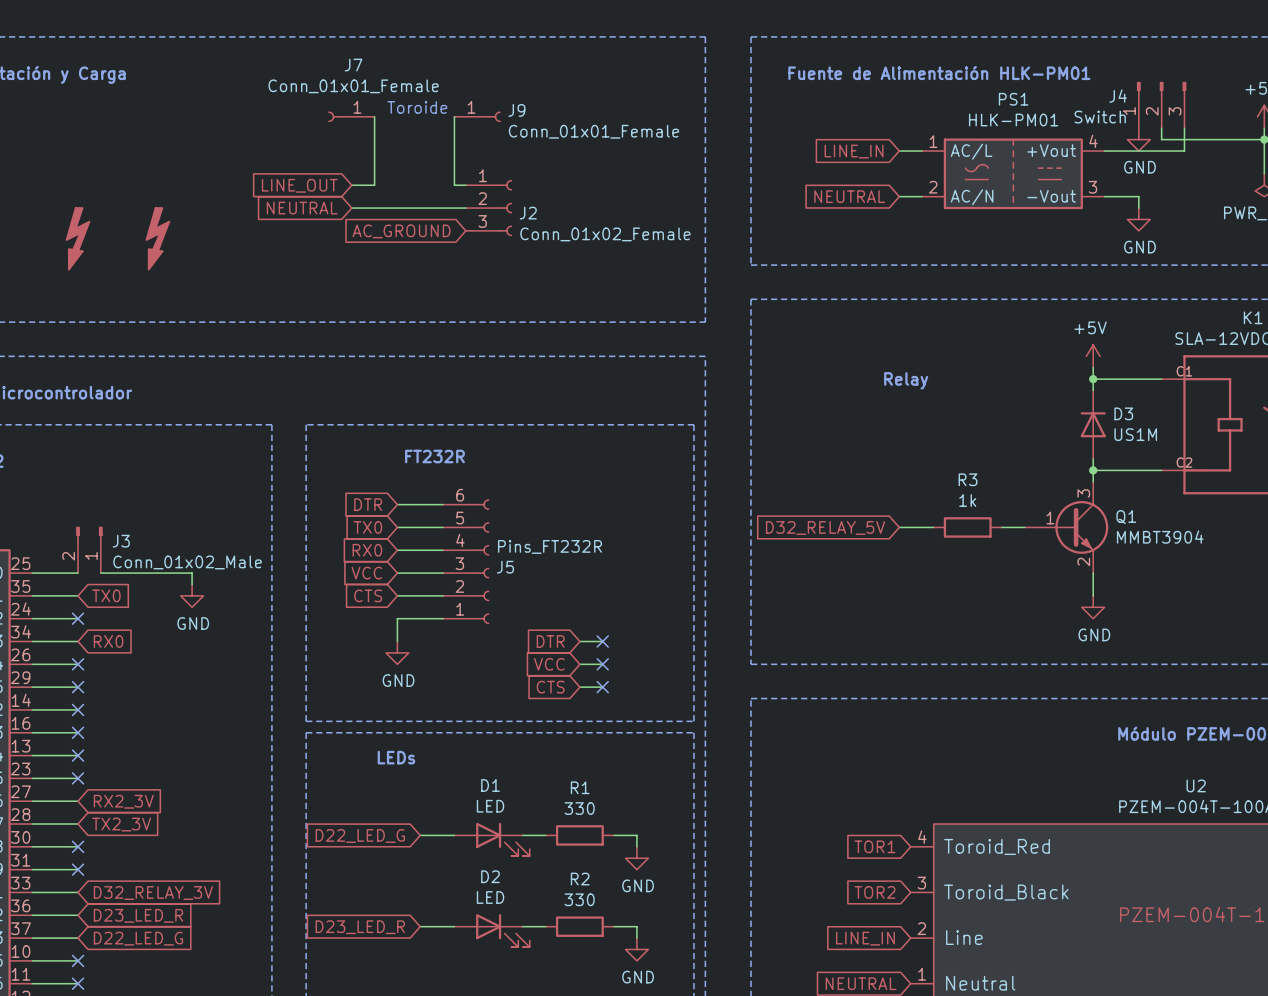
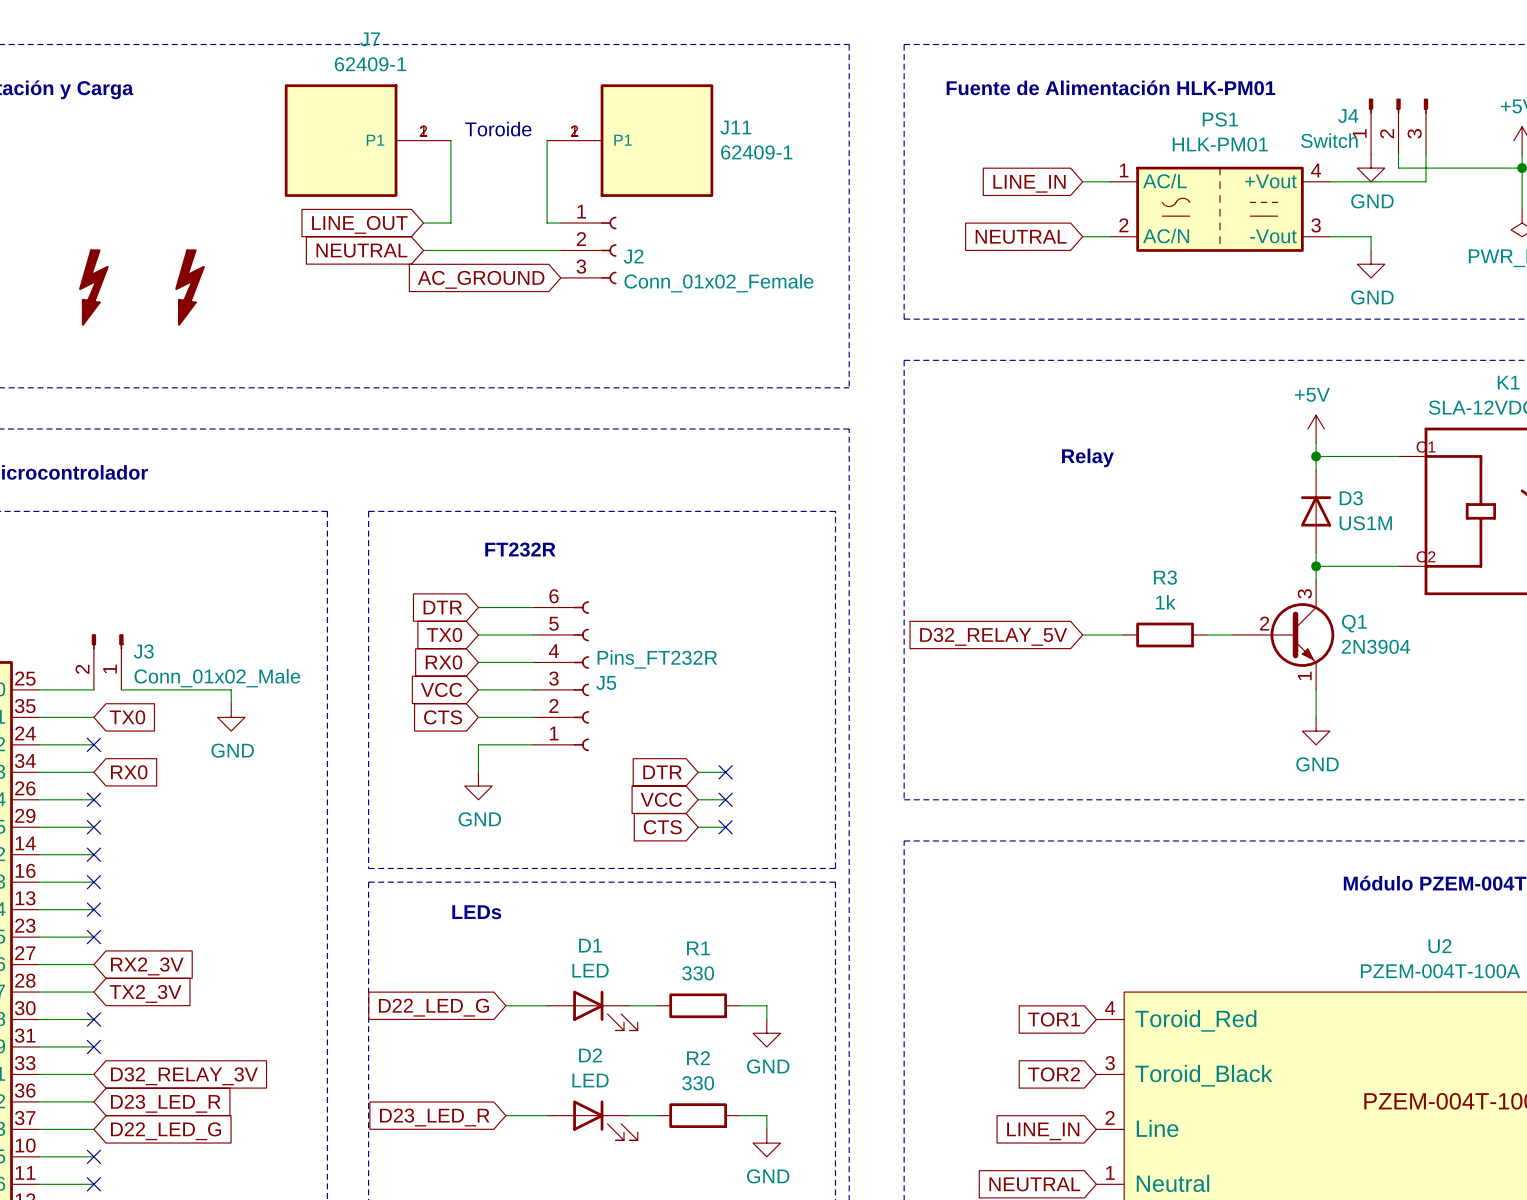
J7 name position: J7 (353, 65) -> J7 (370, 39)
J7 value: Conn_01x01_Female (353, 86) -> 62409-1 (370, 64)
J7 symbol: [328, 111, 375, 123] -> [284, 84, 451, 197]
J9: Conn_01x01_Female (477, 116) -> none
J11: none -> 62409-1 (630, 140)
Q1 pin number: 1 (1050, 518) -> 2 (1264, 623)
Q1 value: MMBT3904 (1160, 537) -> 2N3904 (1376, 646)
Q1 pin number: 2 (1083, 561) -> 1 (1304, 675)

